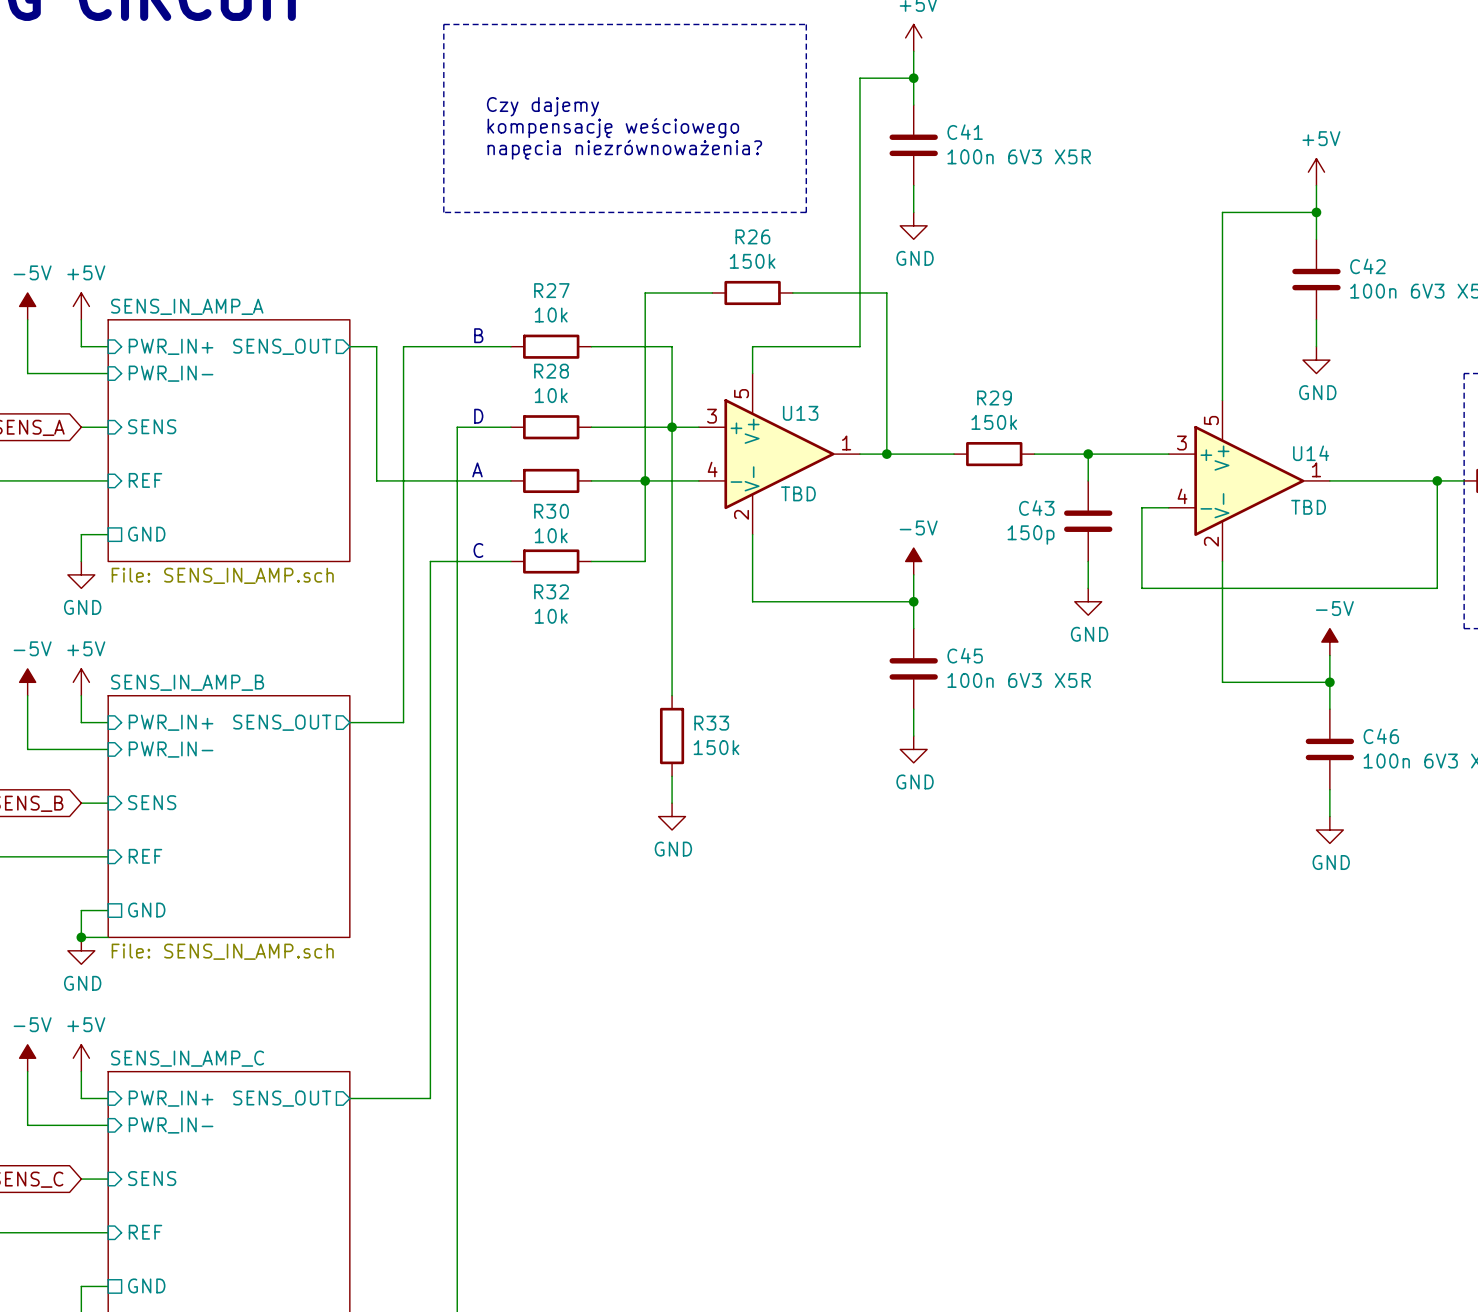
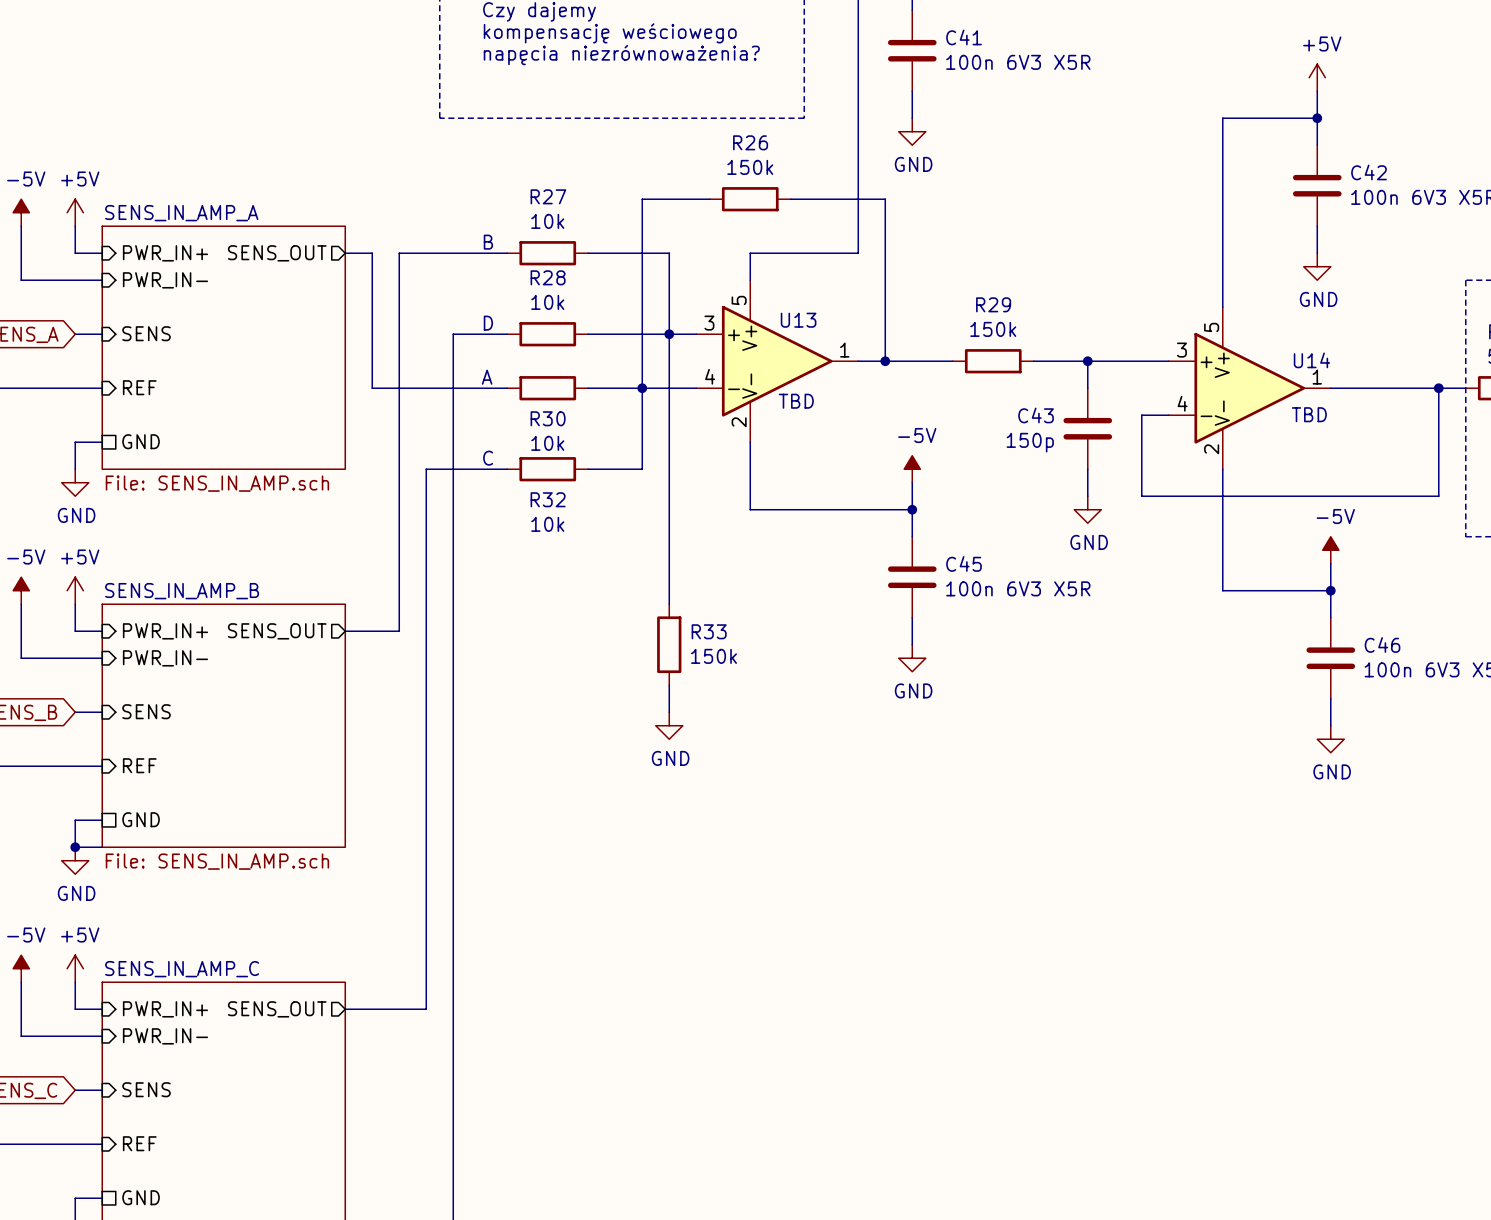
text position: B (478, 335) -> B (488, 242)
text position: D (478, 416) -> D (488, 323)
text position: A (477, 469) -> A (487, 377)
text position: C (478, 550) -> C (488, 458)

